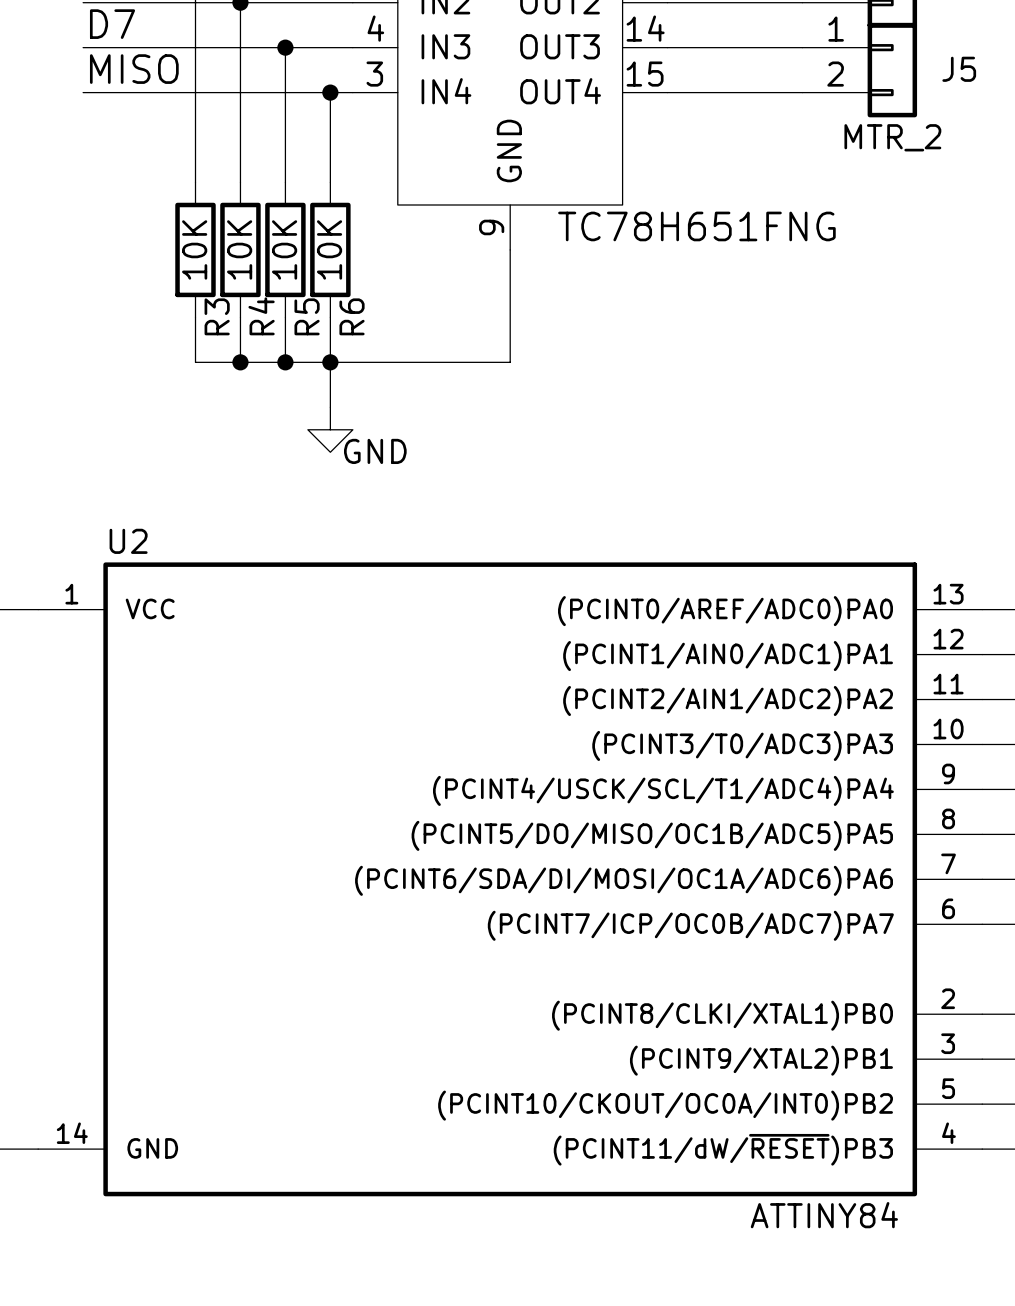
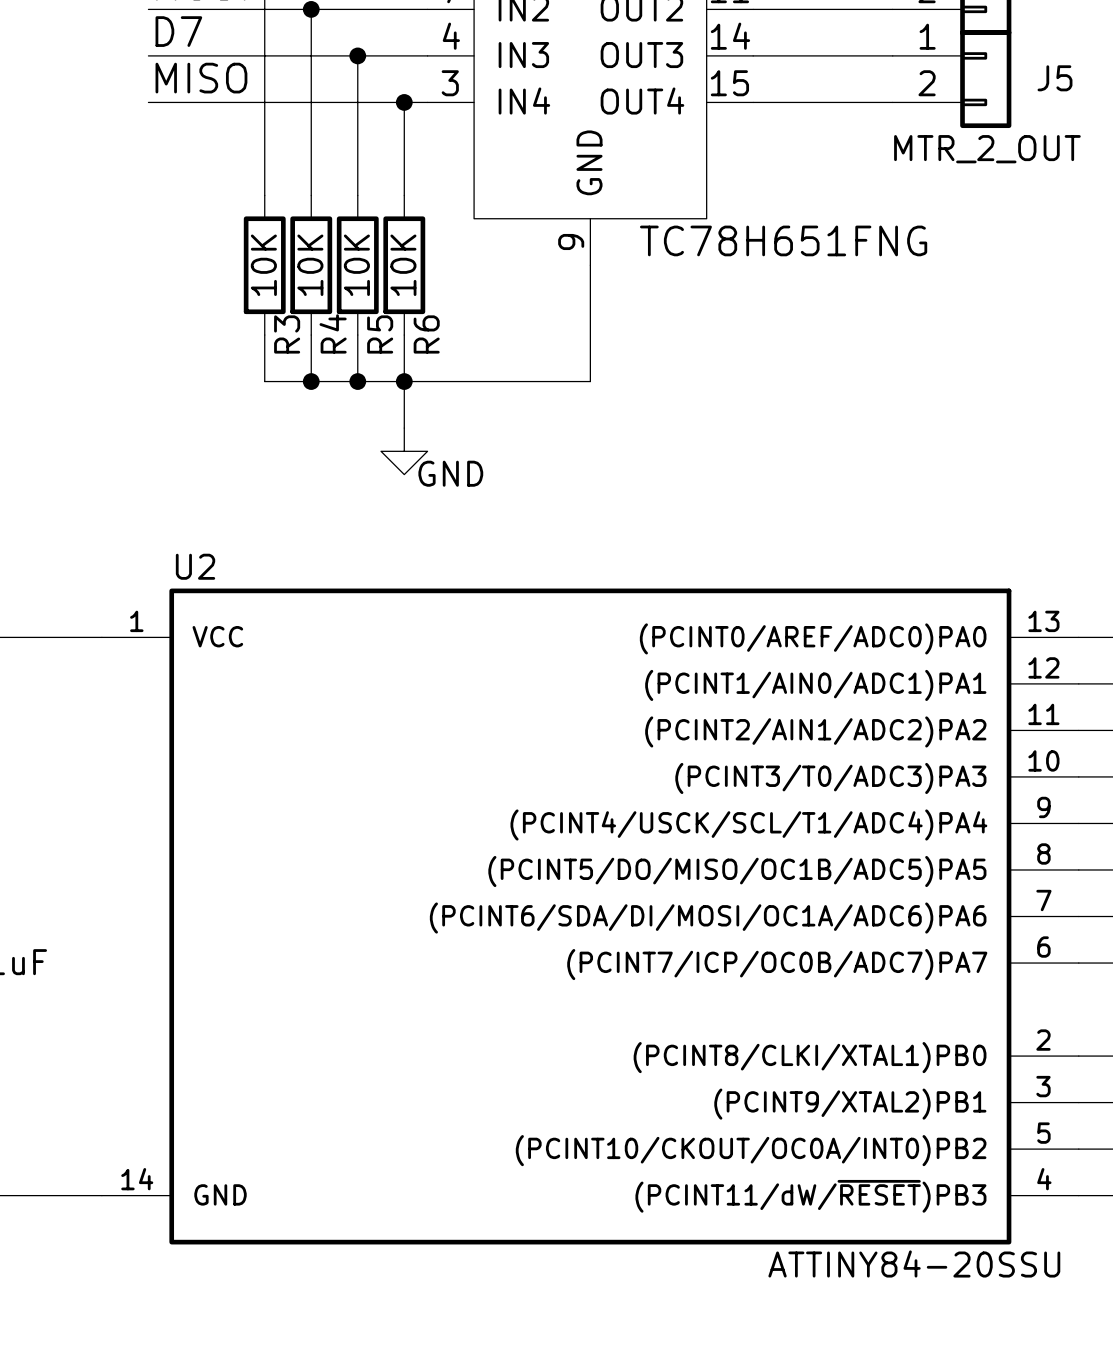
J5 value: MTR_2 (892, 137) -> MTR_2_OUT (987, 149)
U2 value: ATTINY84 (824, 1215) -> ATTINY84-20SSU (914, 1263)

